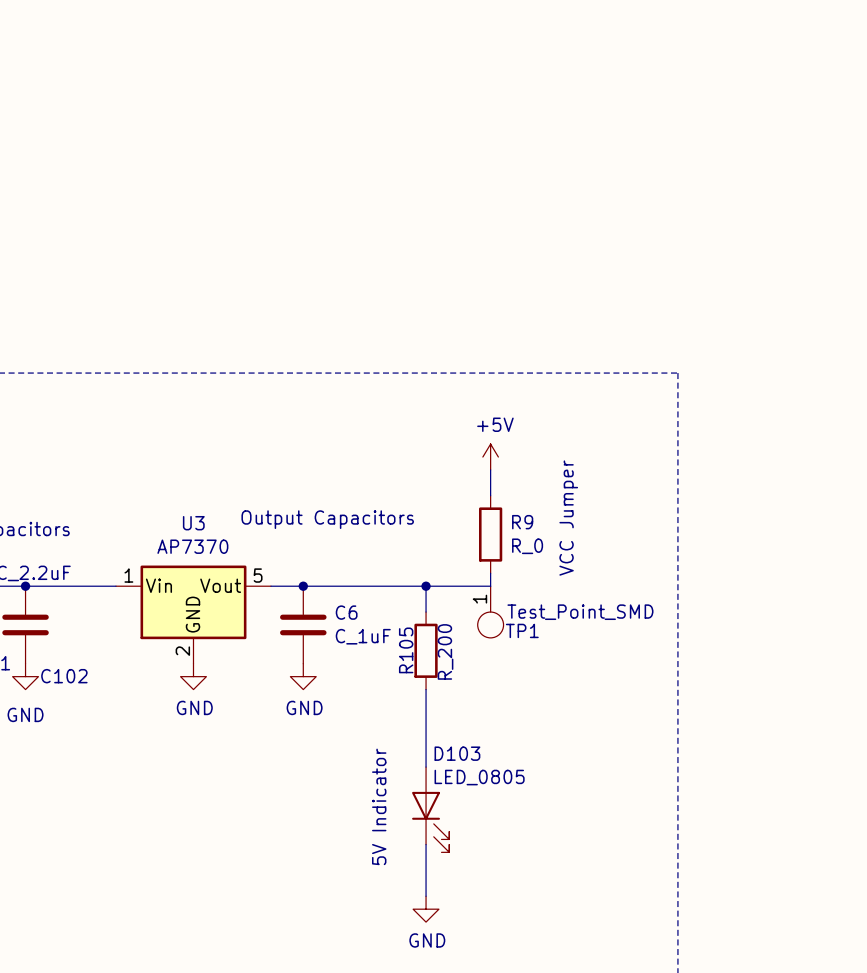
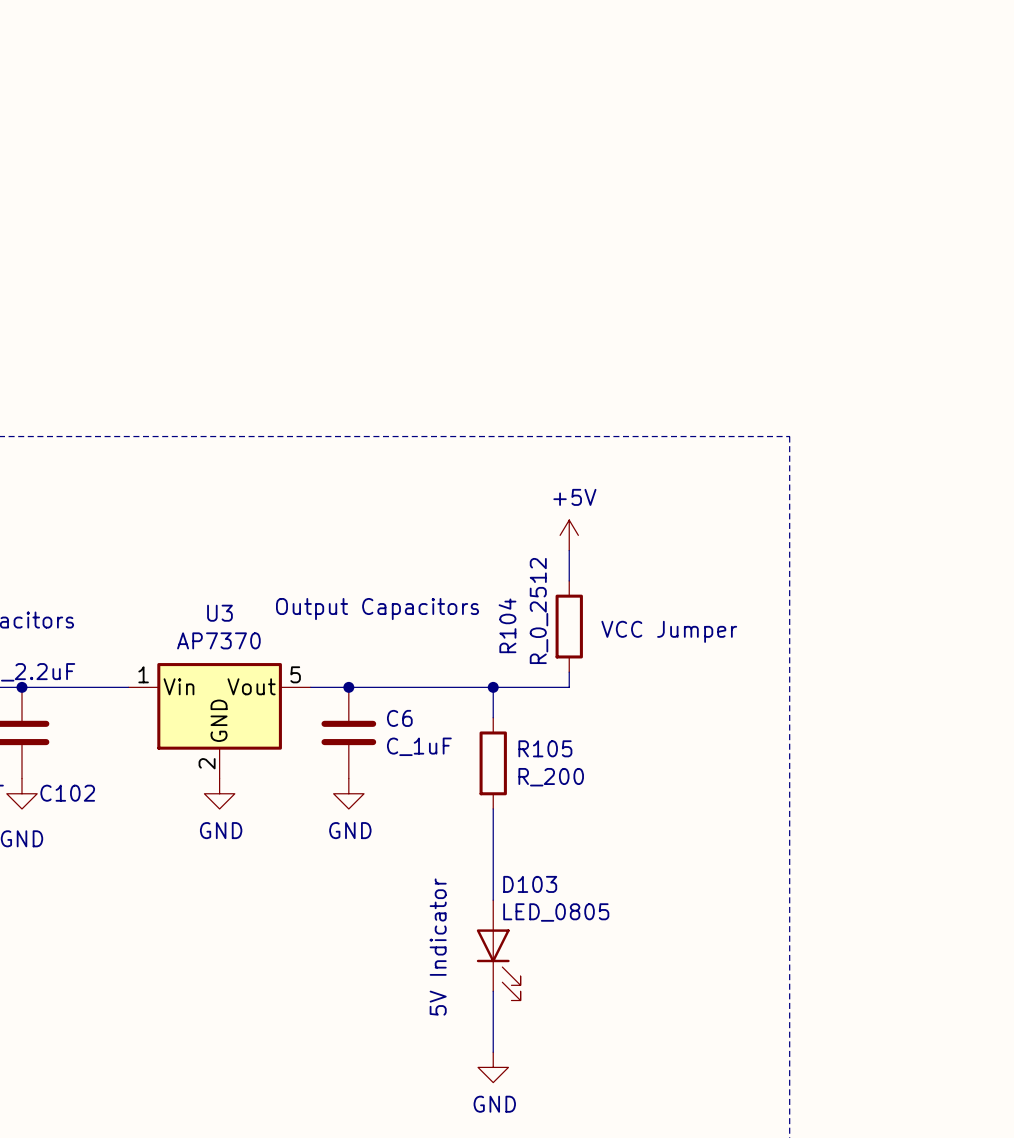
text rotation: 0° (568, 518) -> 90° clockwise (669, 631)
R9 name: R9 (522, 522) -> R104 (507, 625)
R9 value: R_0 (527, 546) -> R_0_2512 (539, 610)
TP1: Test_Point_SMD (490, 612) -> none
R105 name rotation: 0° (406, 650) -> 90° clockwise (545, 748)
R105 name position: R105 (406, 650) -> R105 (545, 748)
R105 value rotation: 0° (445, 651) -> 90° clockwise (551, 777)

